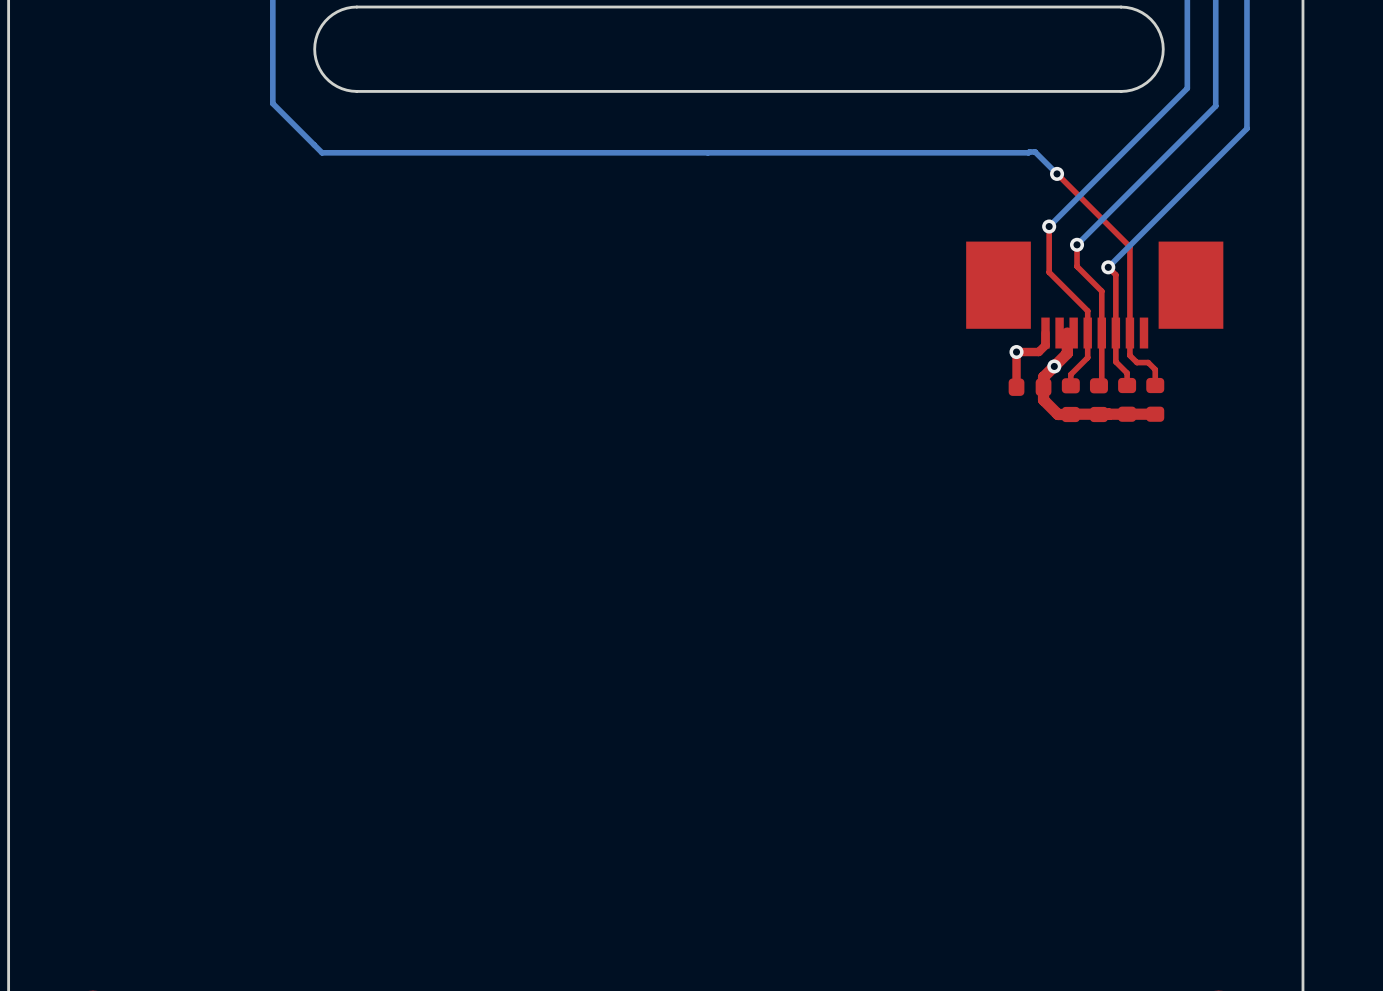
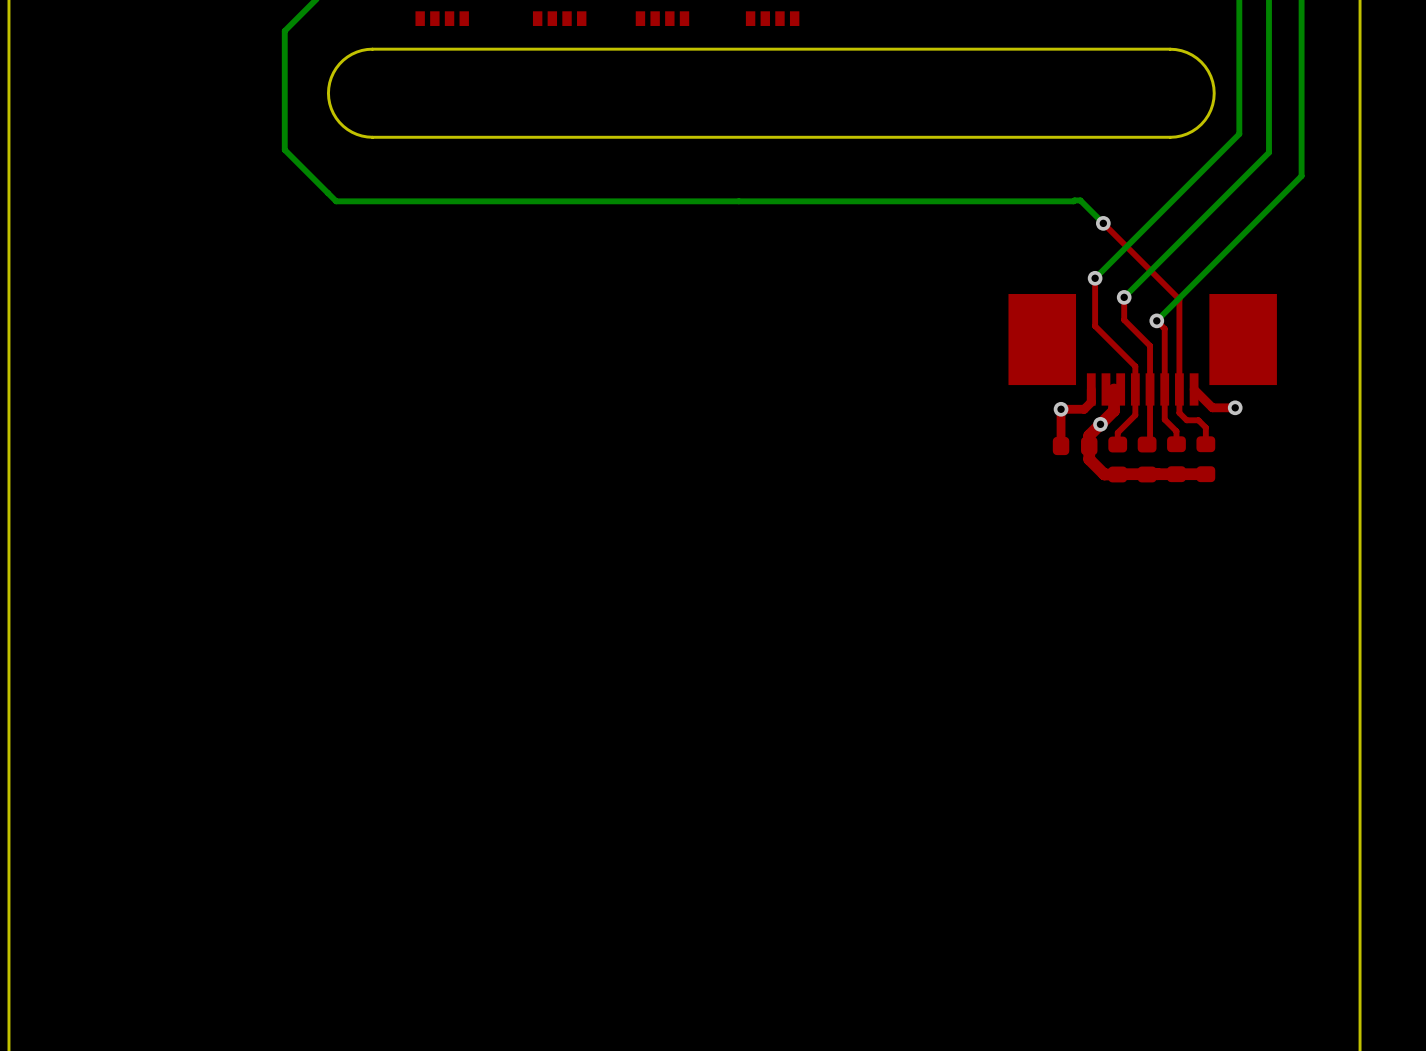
top track: none -> (1194, 389) (1212, 407) (1235, 407)
via: none -> (1235, 407)

